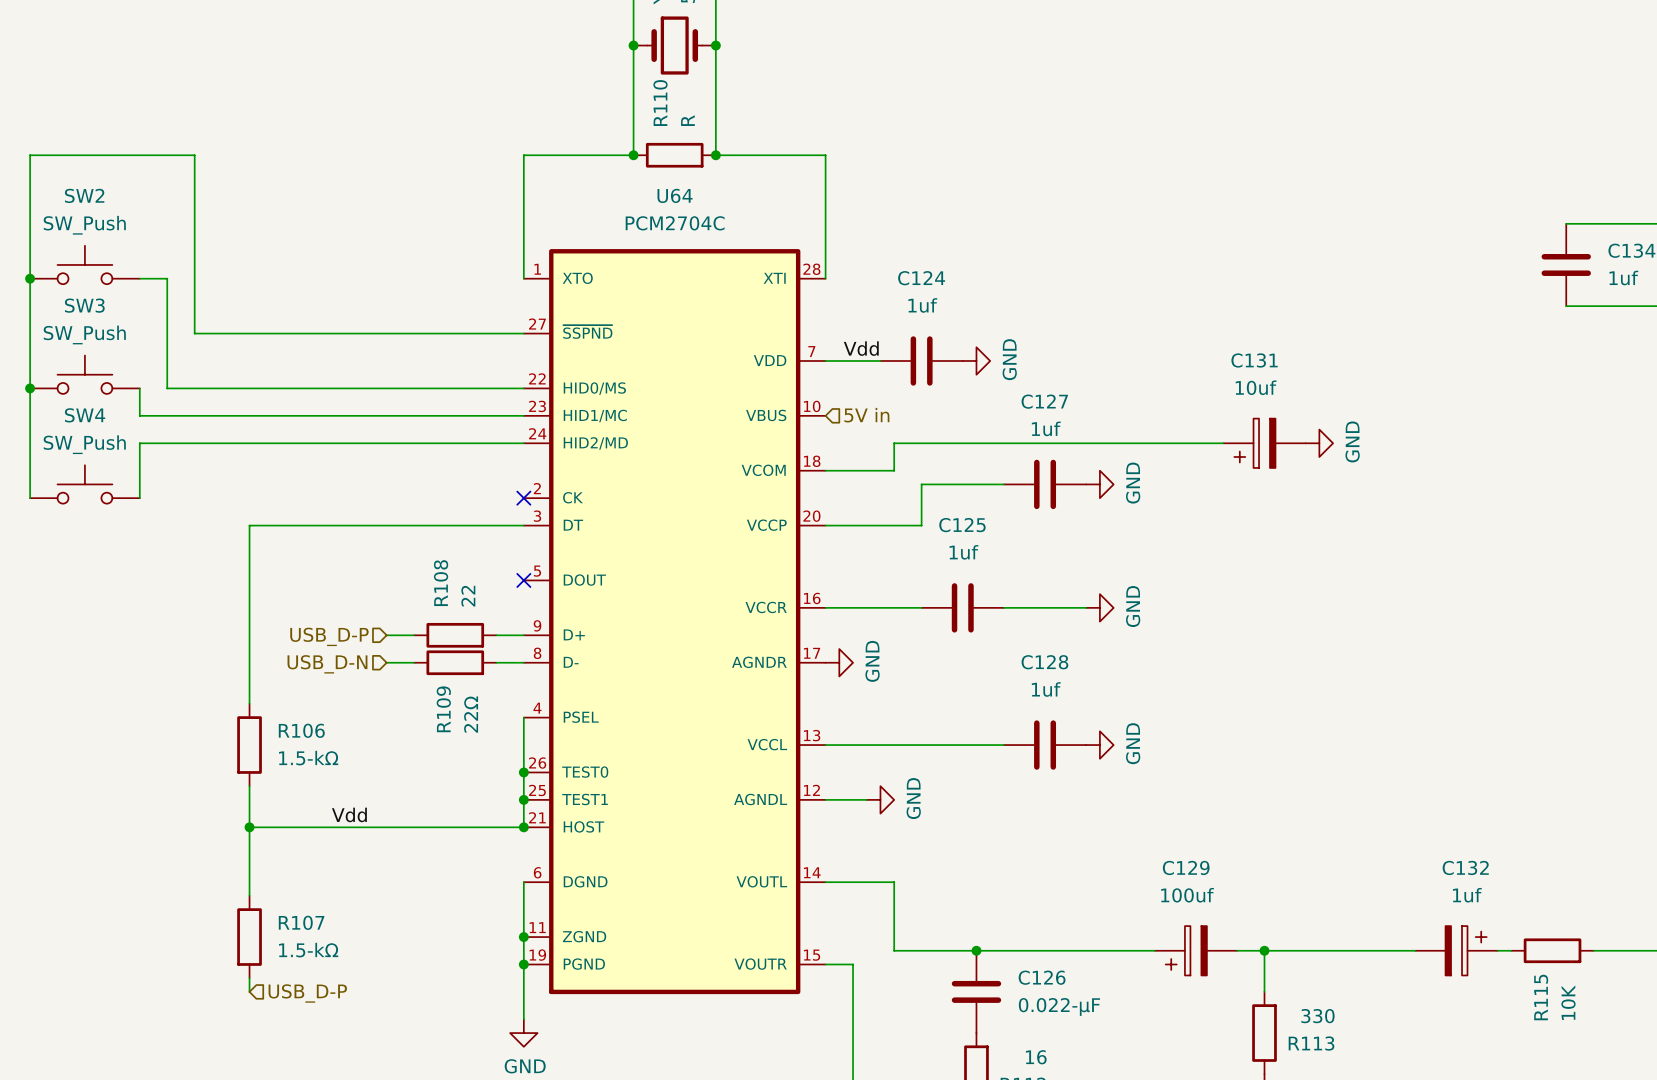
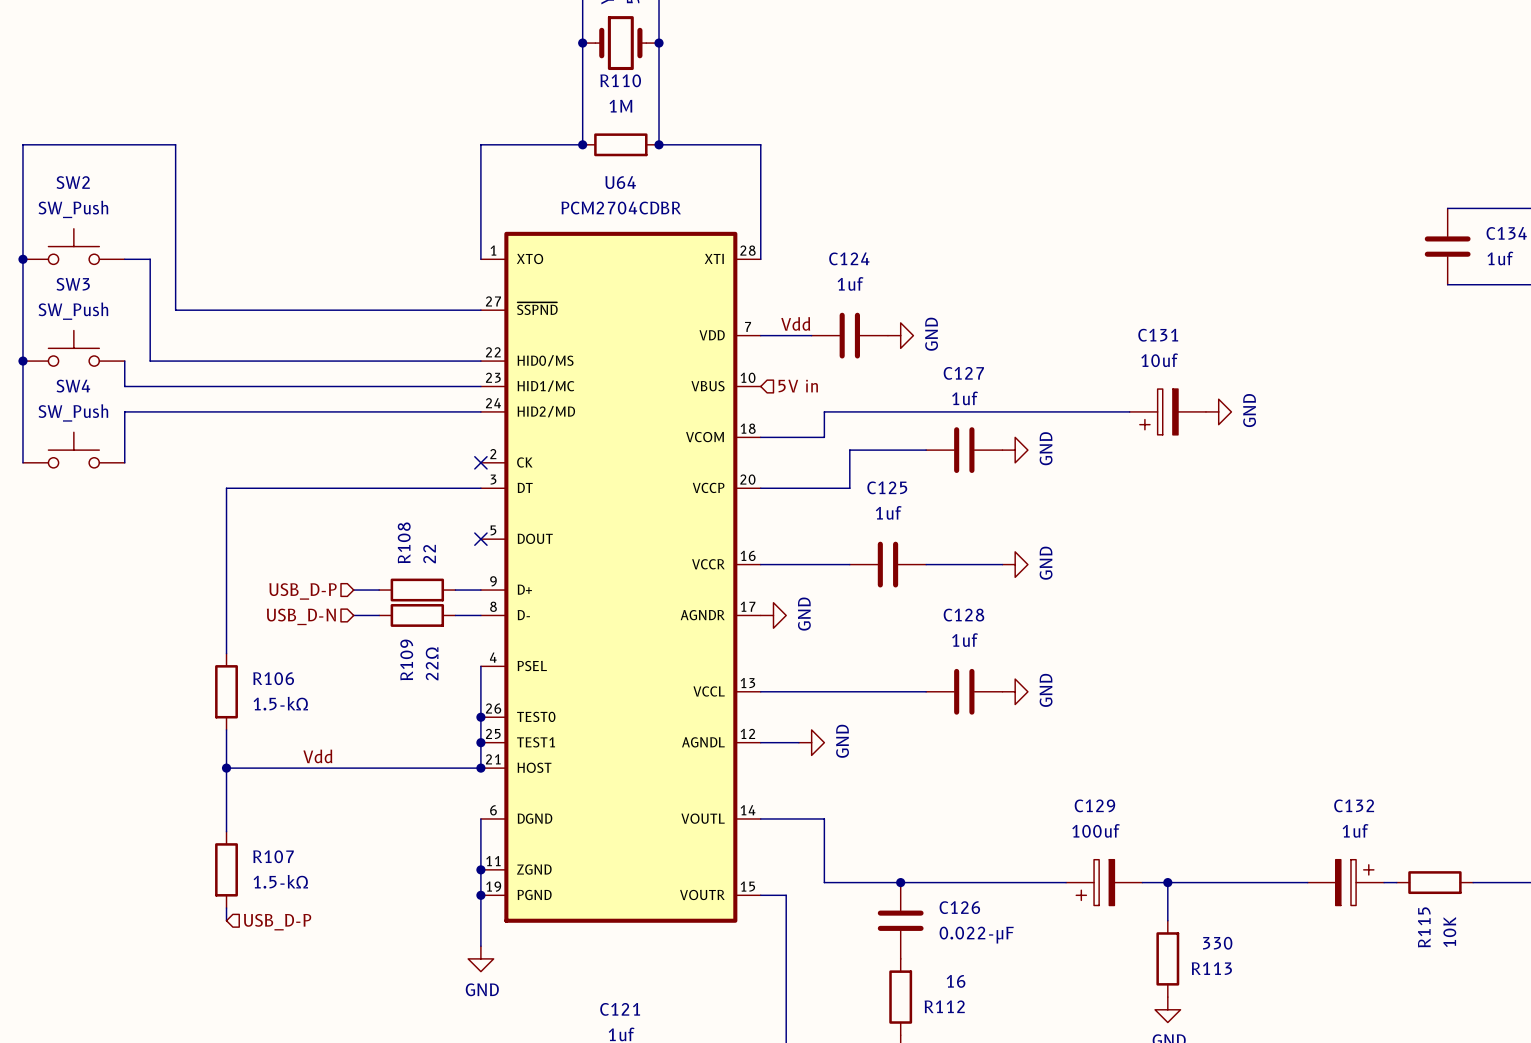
R110 name rotation: 0° (660, 103) -> 90° clockwise (620, 80)
R110 value: R (687, 120) -> 1M (620, 106)
U64 value: PCM2704C (675, 223) -> PCM2704CDBR (621, 208)

